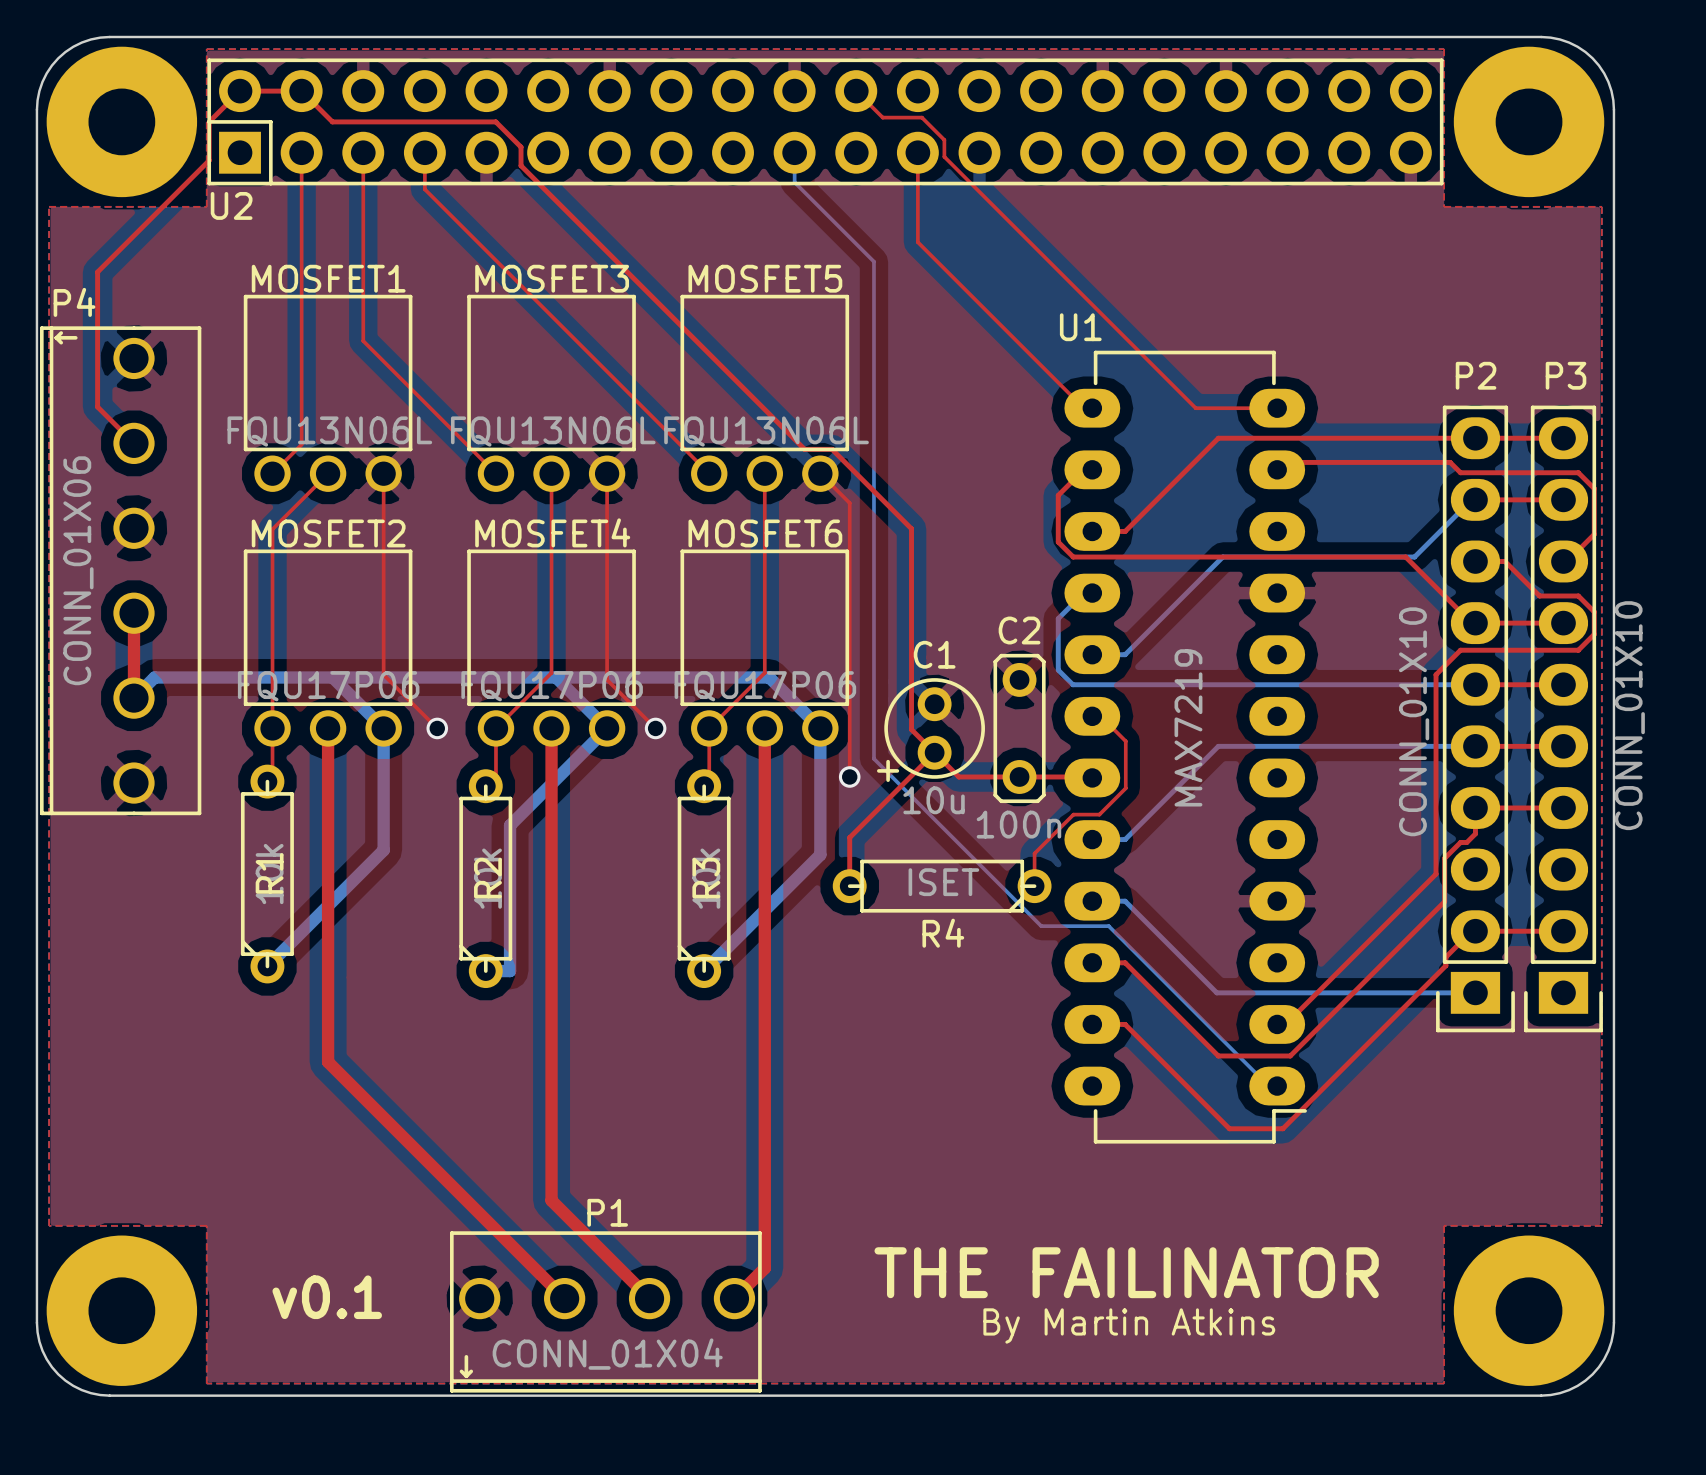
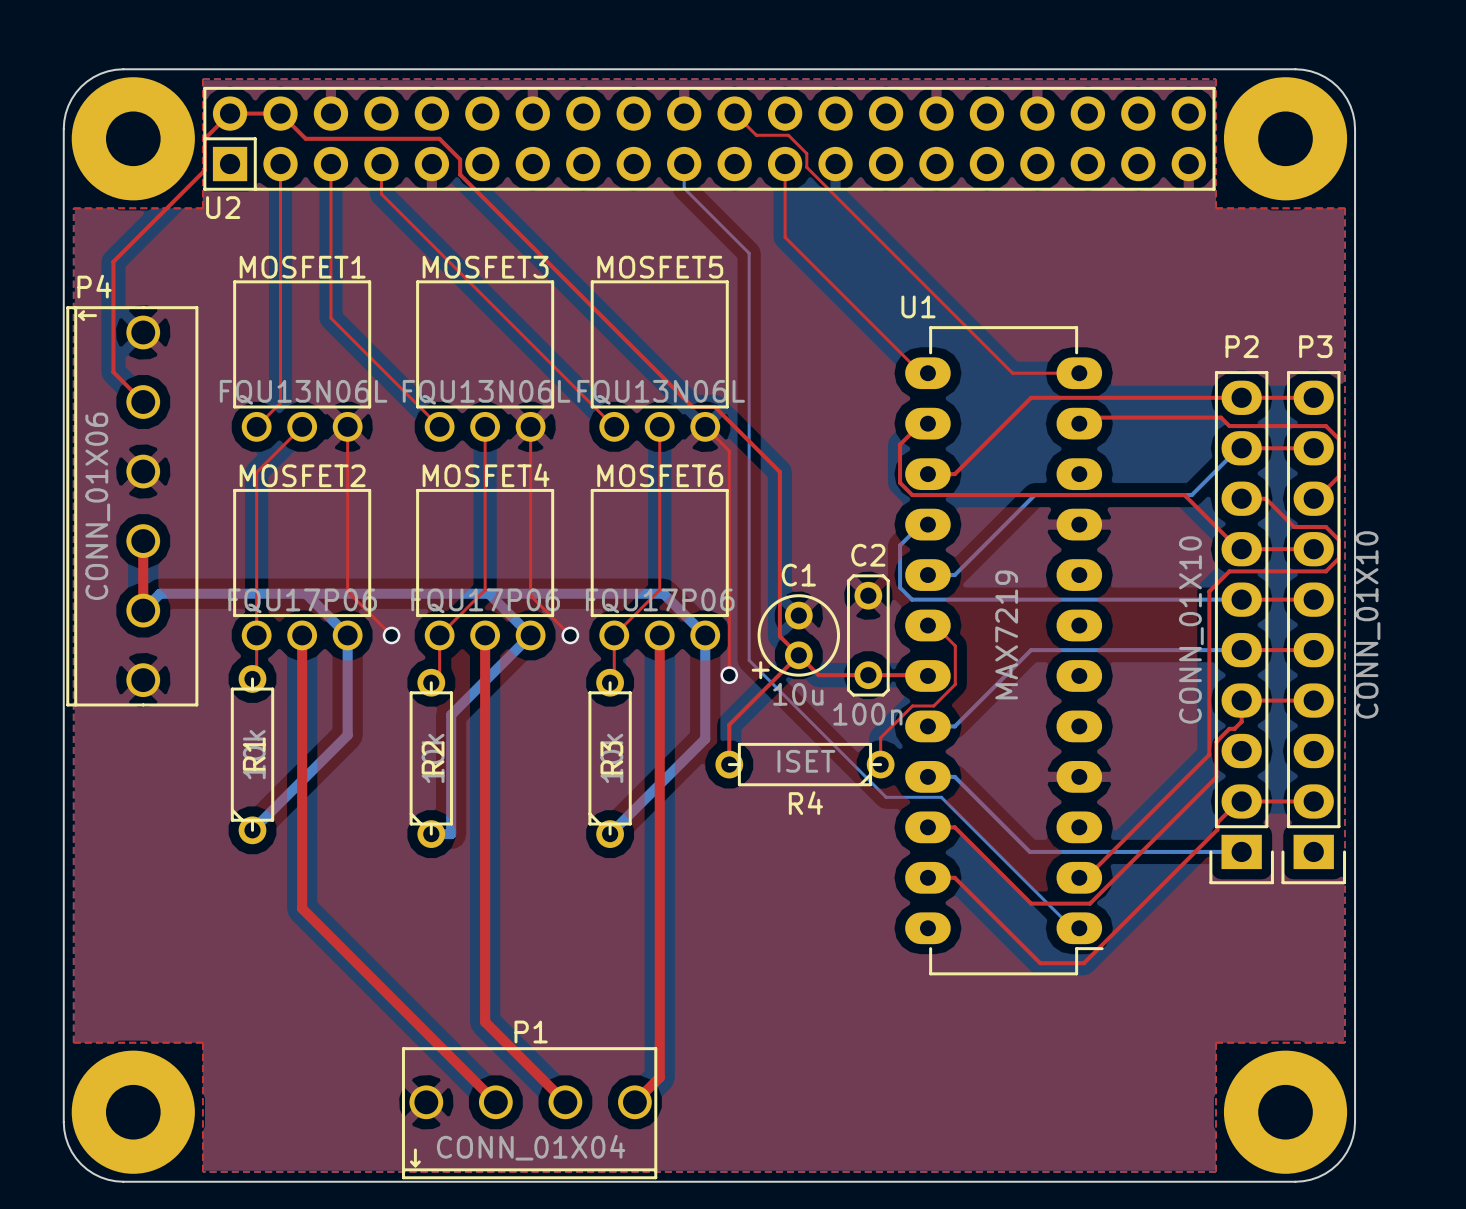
text: THE FAILINATOR (1126, 1272) -> none
text: v0.1 (327, 1297) -> none
text: By Martin Atkins (1129, 1326) -> none

